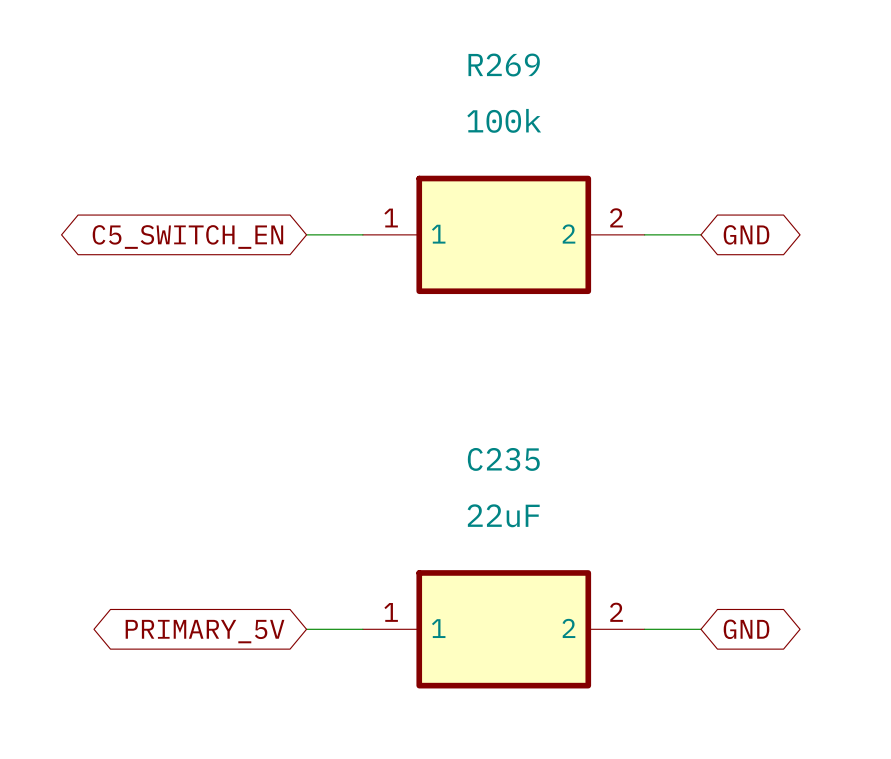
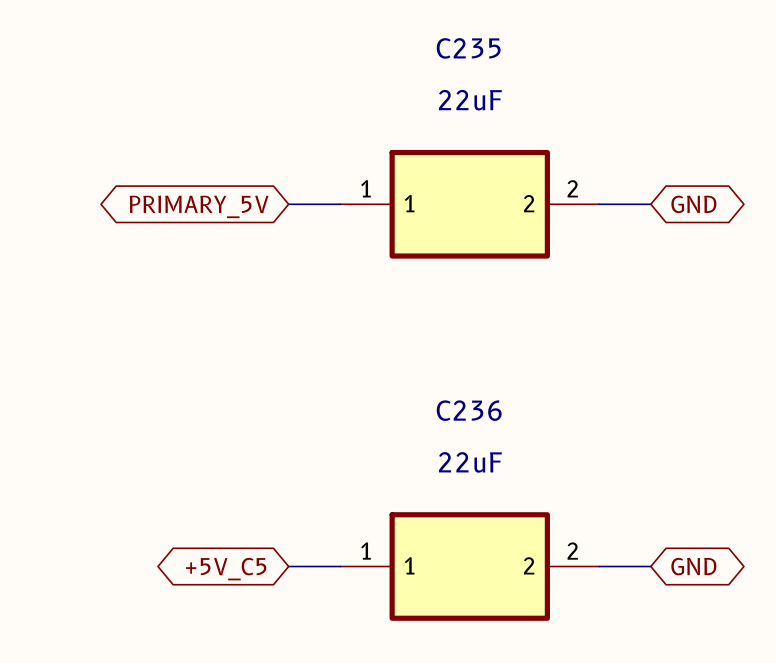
R269 name: R269 (504, 65) -> C235 (468, 48)
R269 value: 100k (504, 120) -> 22uF (470, 100)
global label: C5_SWITCH_EN (187, 237) -> PRIMARY_5V (199, 206)
C235 name: C235 (503, 459) -> C236 (469, 410)
global label: PRIMARY_5V (205, 631) -> +5V_C5 (226, 569)

